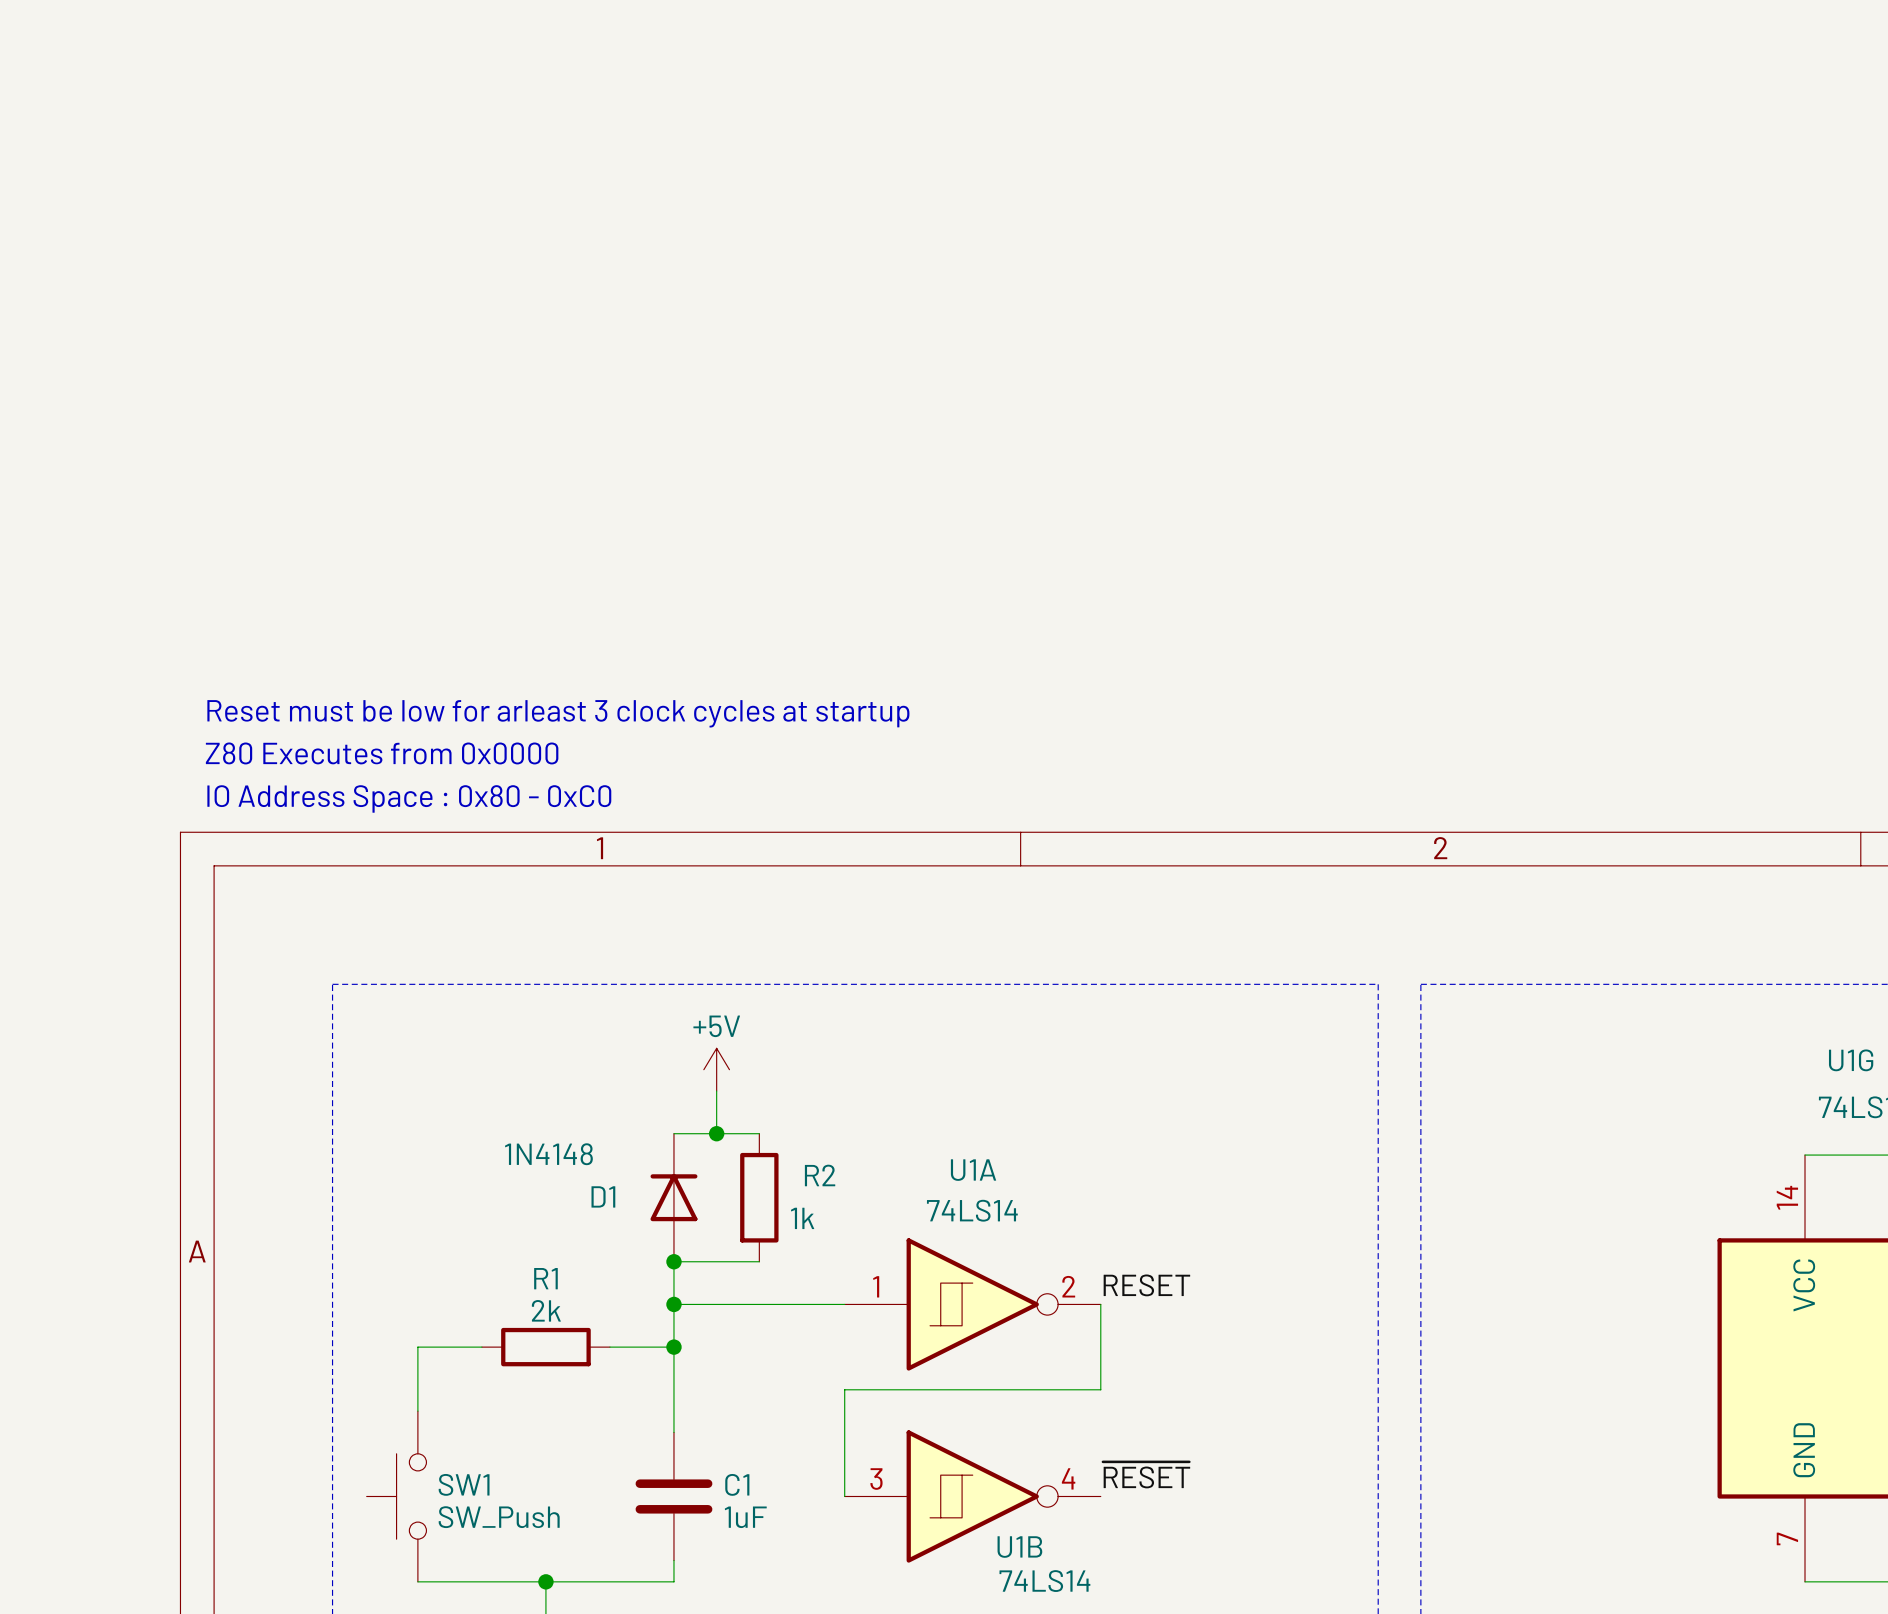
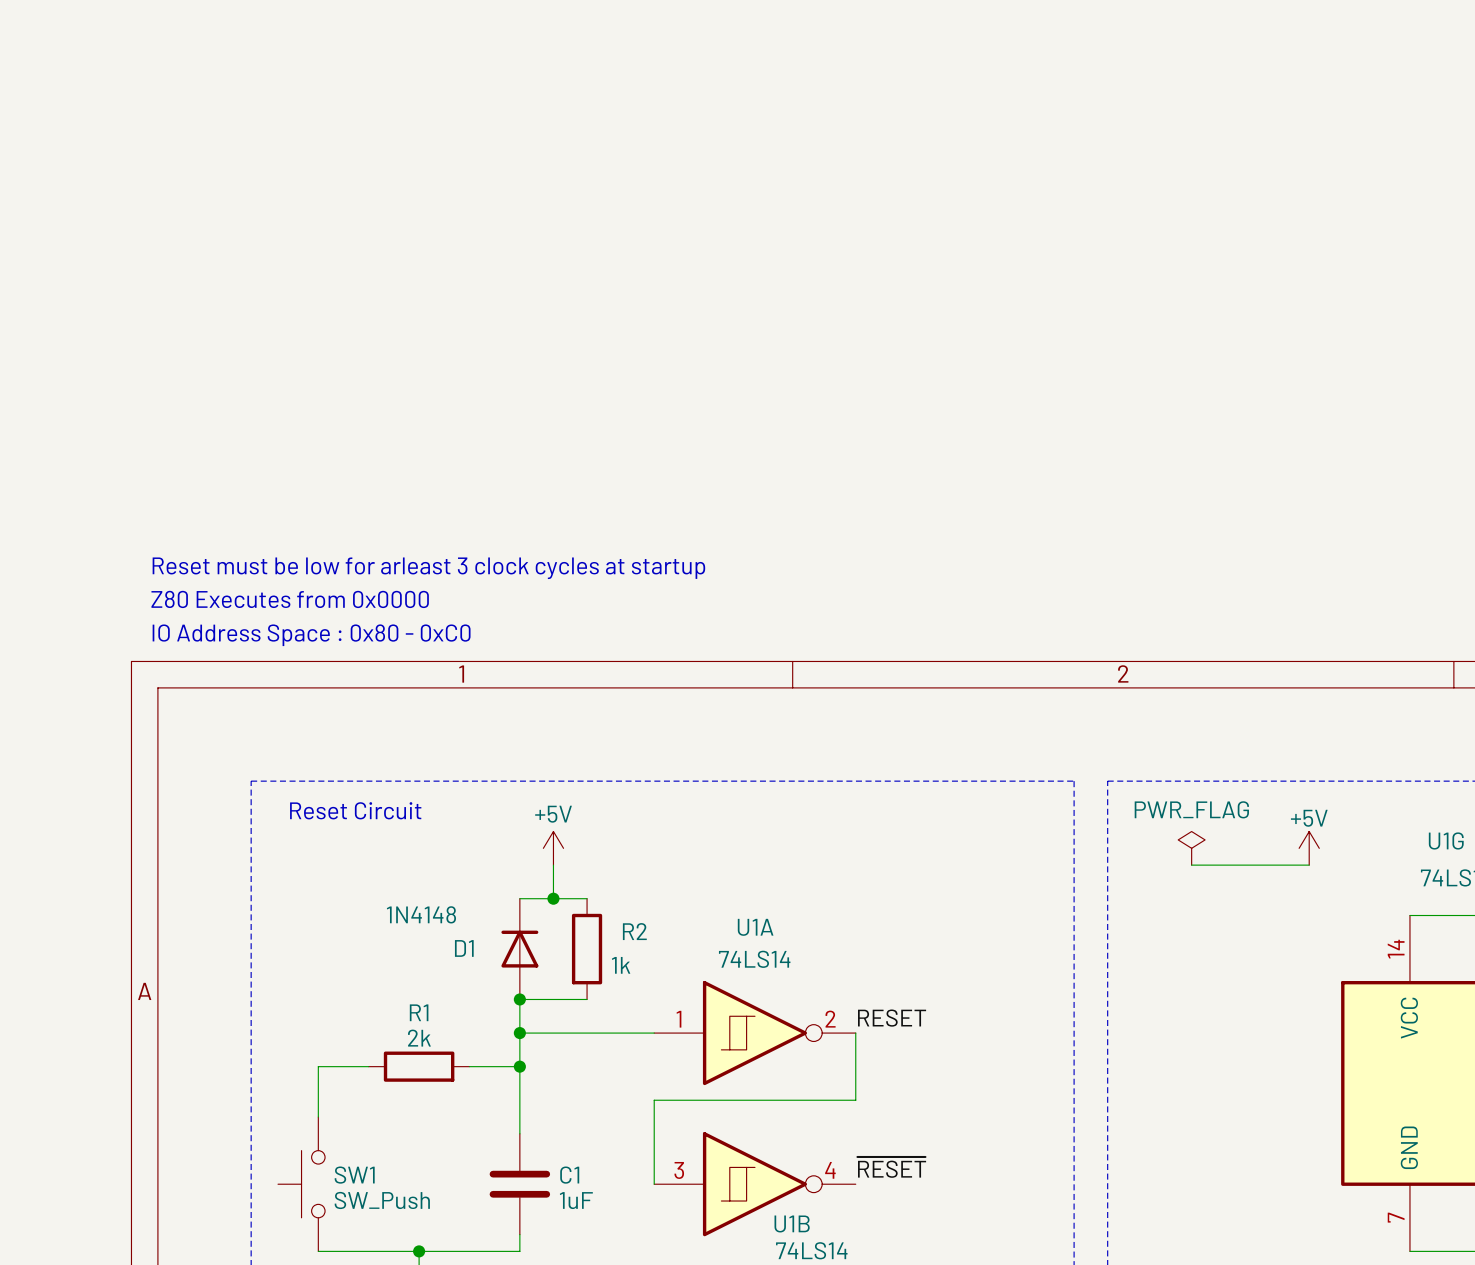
text: none -> Reset Circuit (355, 810)
power symbol: none -> PWR_FLAG (1191, 848)
power symbol: none -> +5V (1309, 848)
wire: none -> (1191, 865) (1309, 865)

